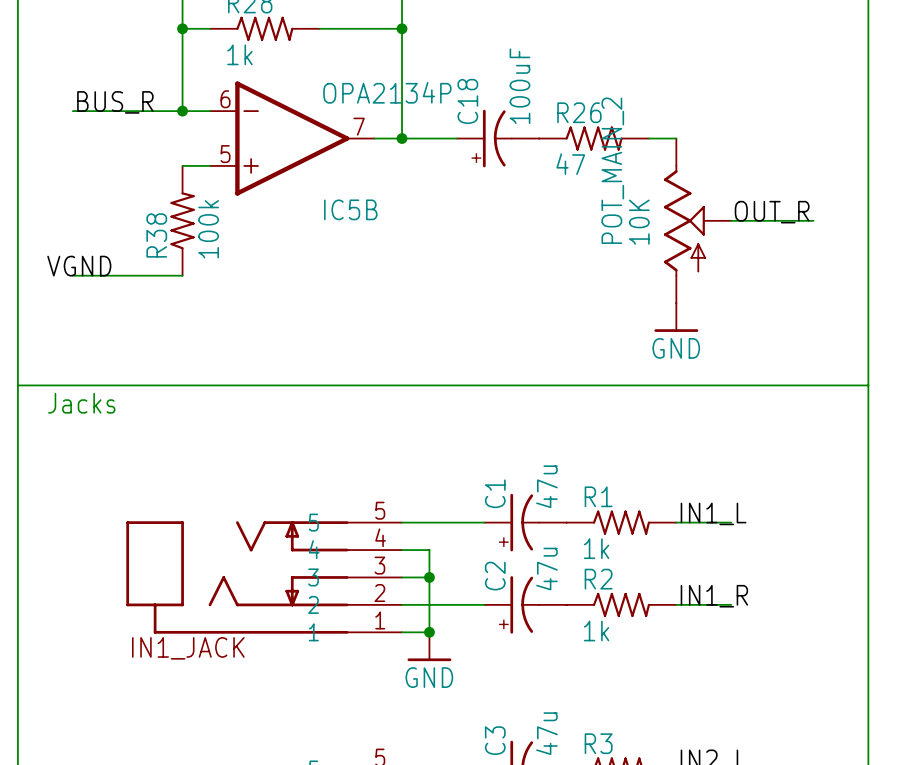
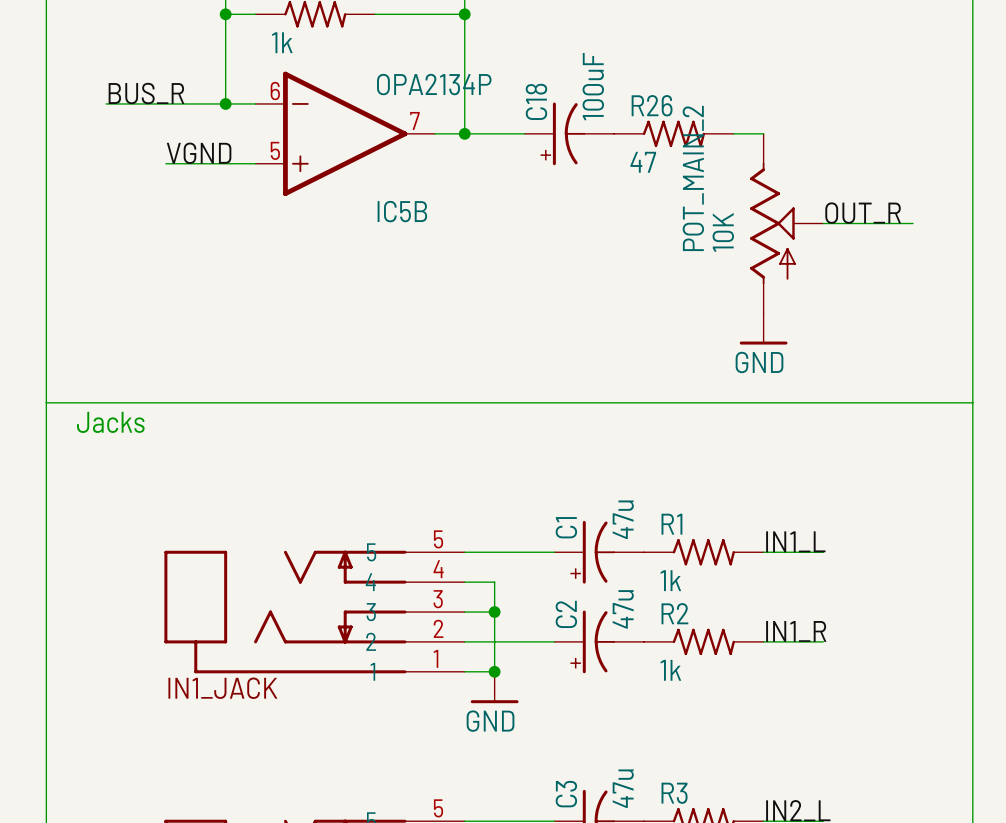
wire: none -> (165, 163) (225, 163)
R38: 100k (182, 220) -> none
label position: VGND (79, 266) -> VGND (199, 153)
wire: (72, 275) (182, 275) -> none

